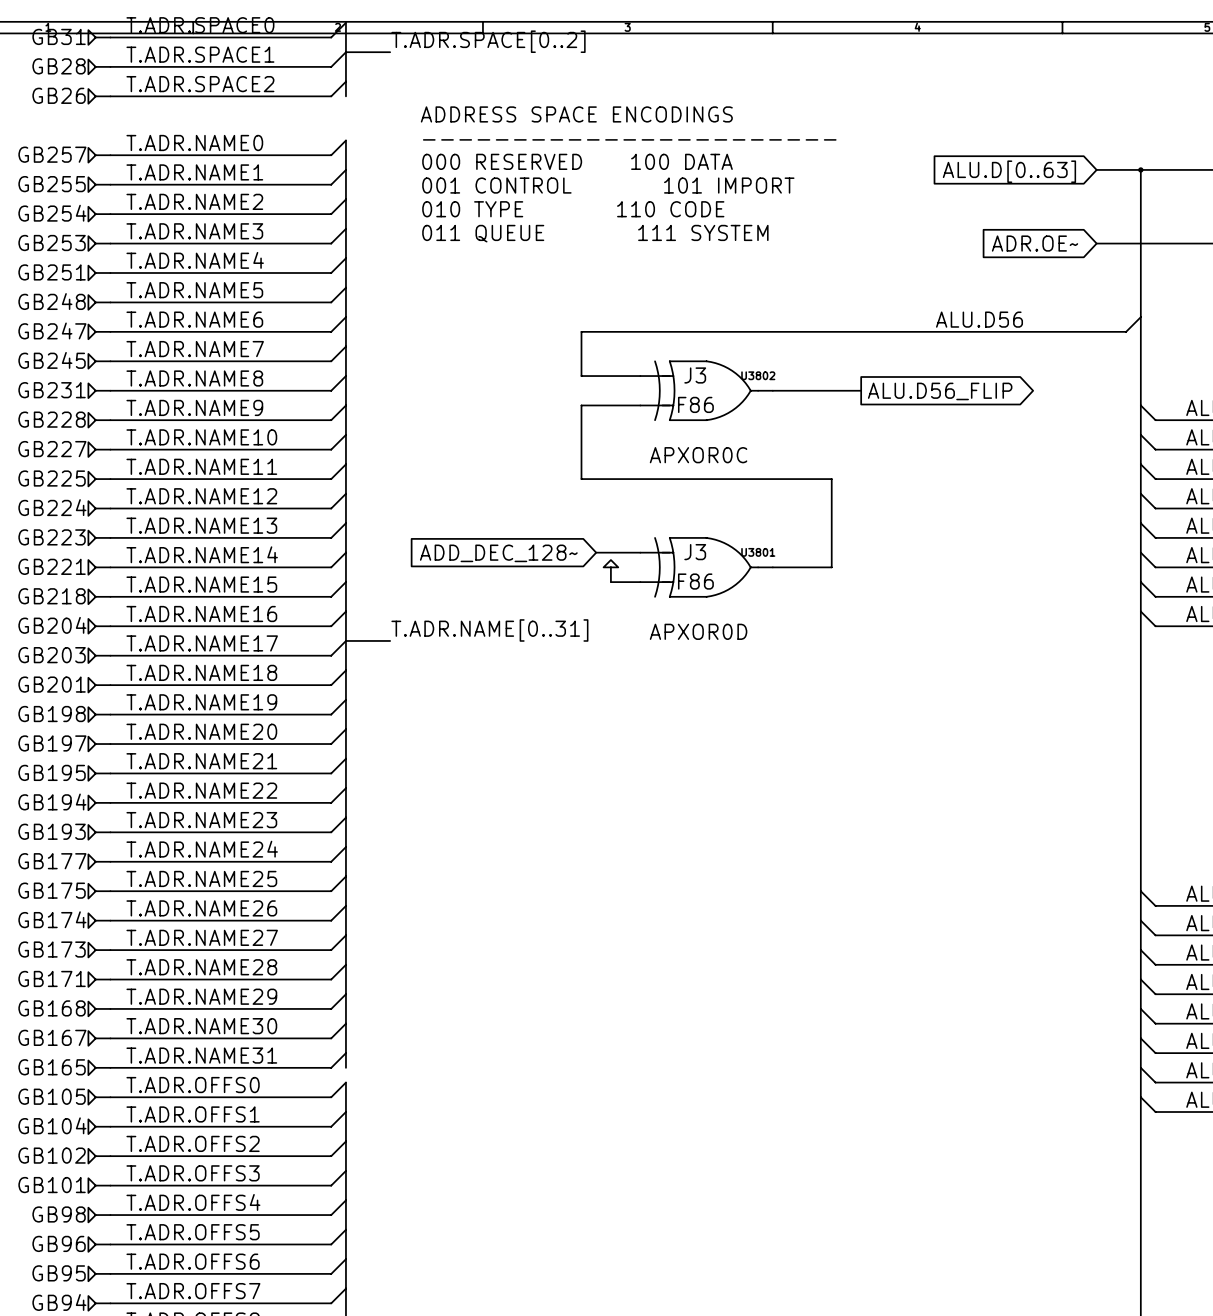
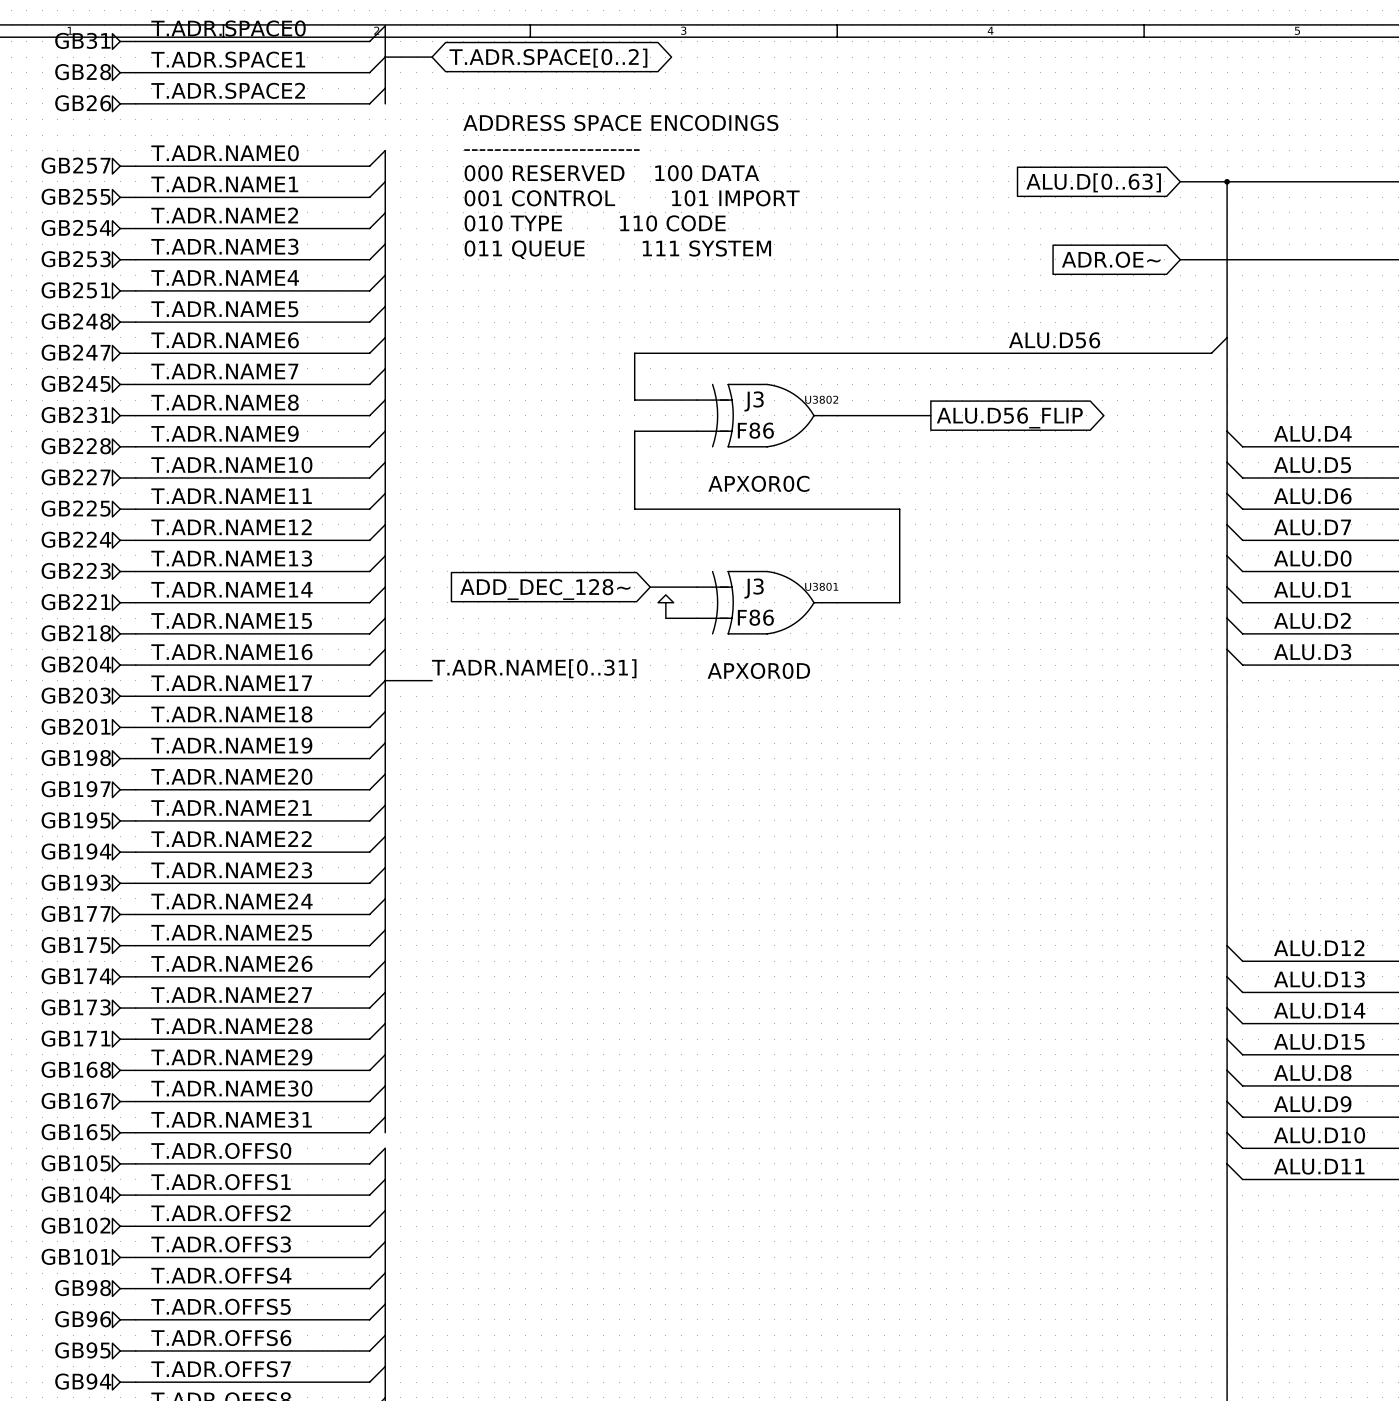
label: T.ADR.SPACE[0..2] (488, 41) -> none
global label: none -> T.ADR.SPACE[0..2] (548, 58)

